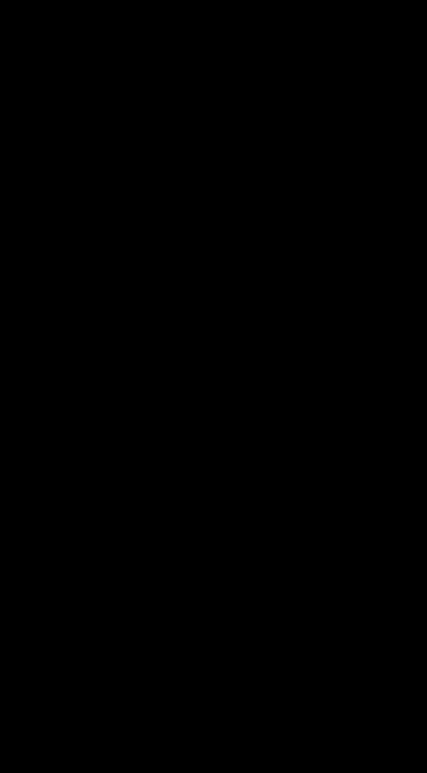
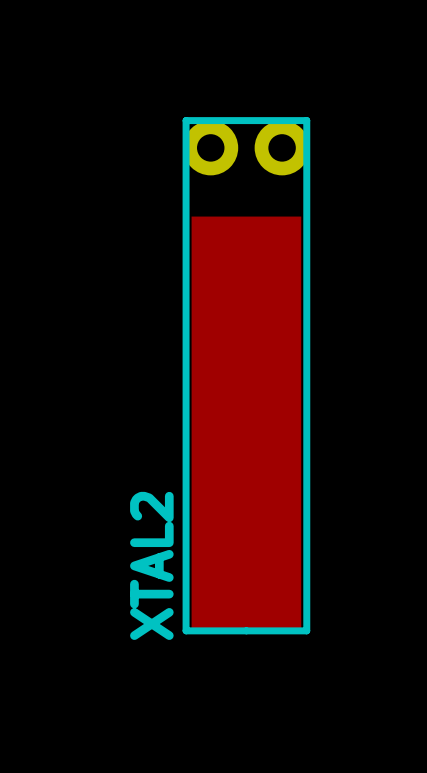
XTAL2: none -> (246, 375)

